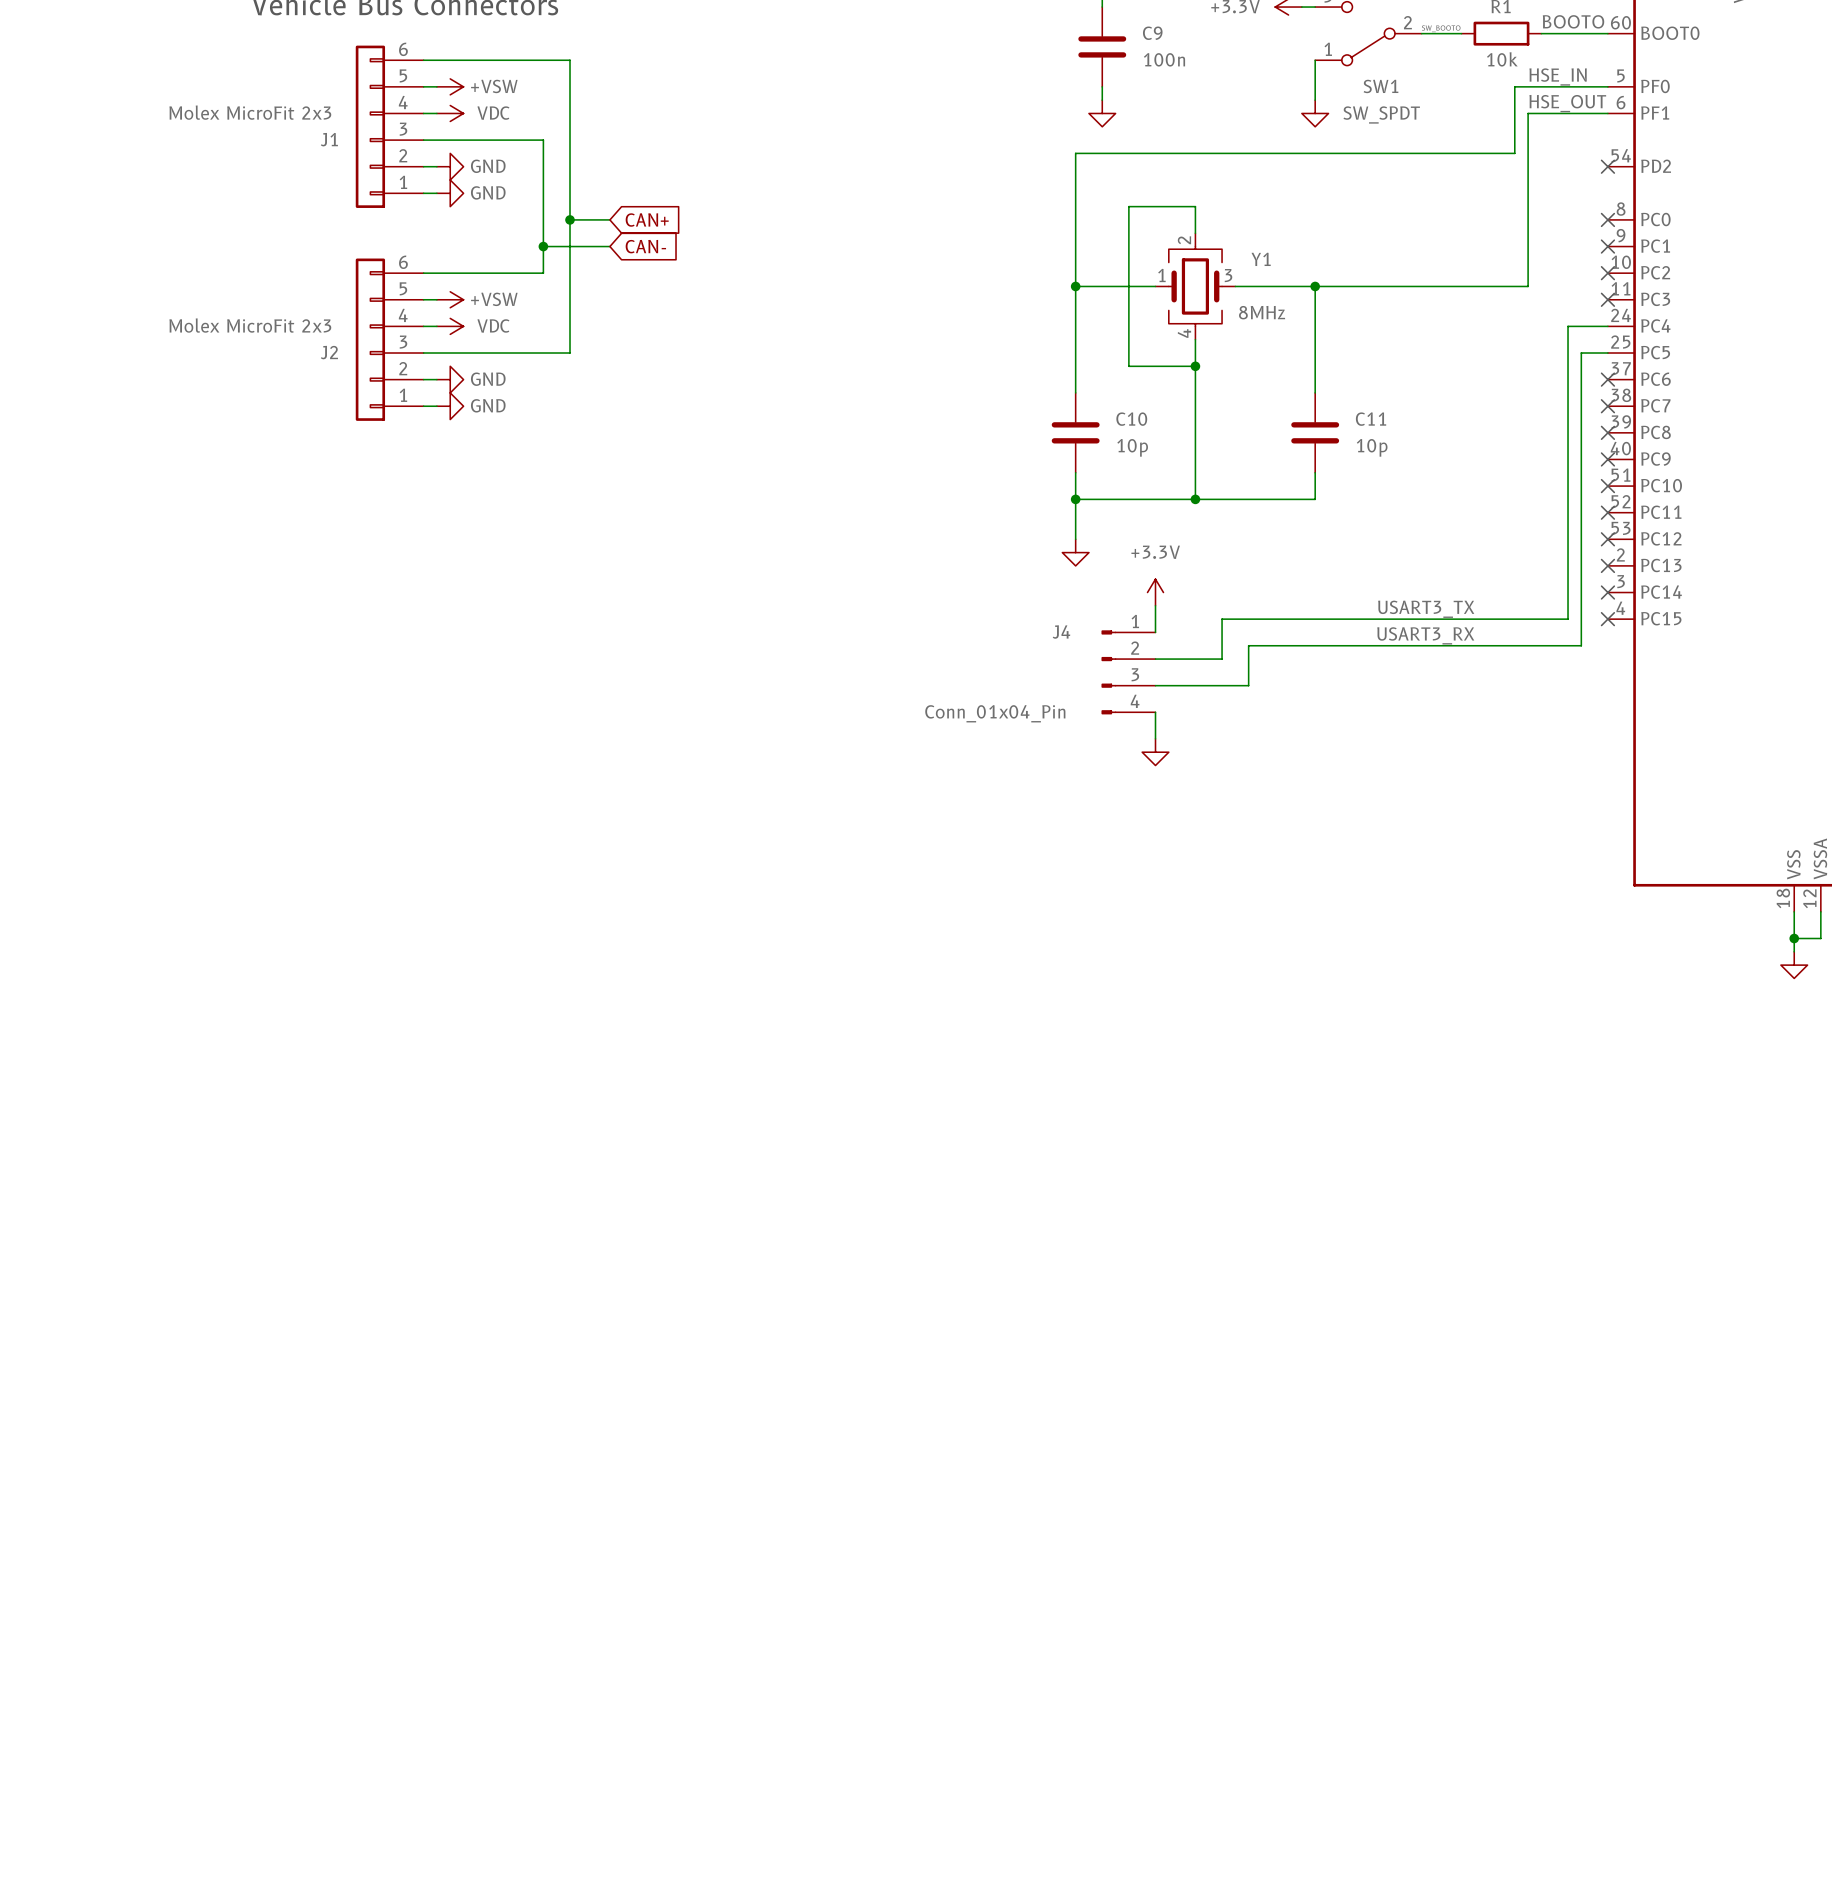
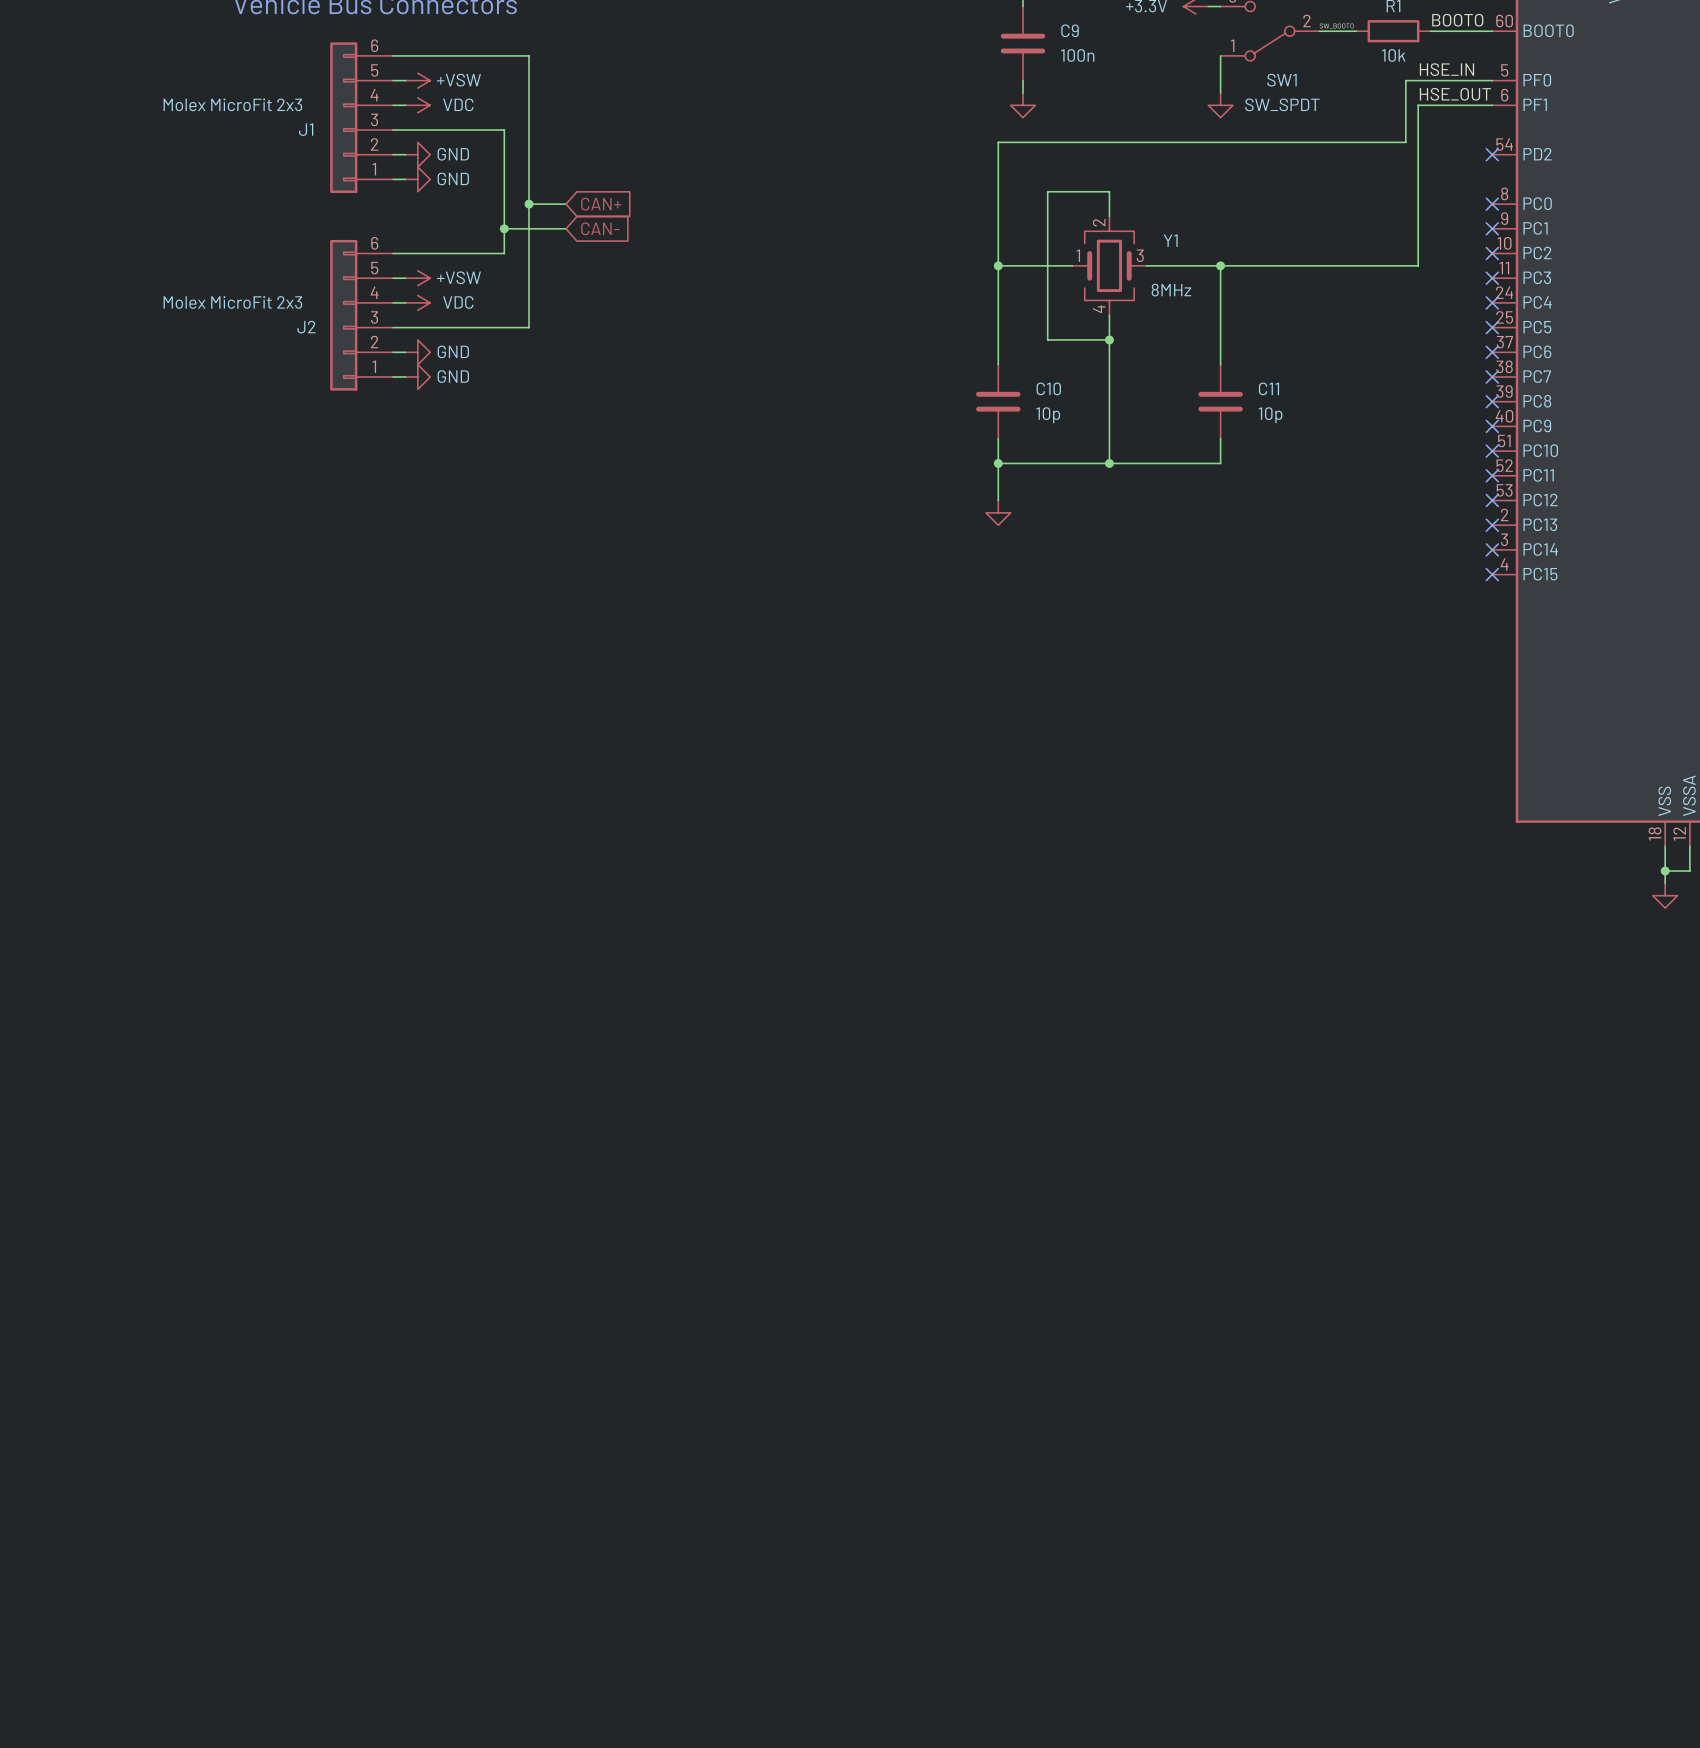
wire: (1607, 326) (1568, 326) (1568, 619) (1222, 619) (1222, 659) (1155, 659) -> none
no-connect mark: none -> (1492, 302)
wire: (1607, 353) (1581, 353) (1581, 645) (1248, 645) (1248, 685) (1155, 685) -> none
no-connect mark: none -> (1492, 327)
power symbol: +3.3V (1155, 592) -> none
wire: (1155, 605) (1155, 632) -> none
label: USART3_TX (1426, 609) -> none
label: USART3_RX (1425, 635) -> none
J4: Conn_01x04_Pin (1128, 672) -> none
wire: (1155, 712) (1155, 738) -> none
power symbol: (1155, 752) -> none

